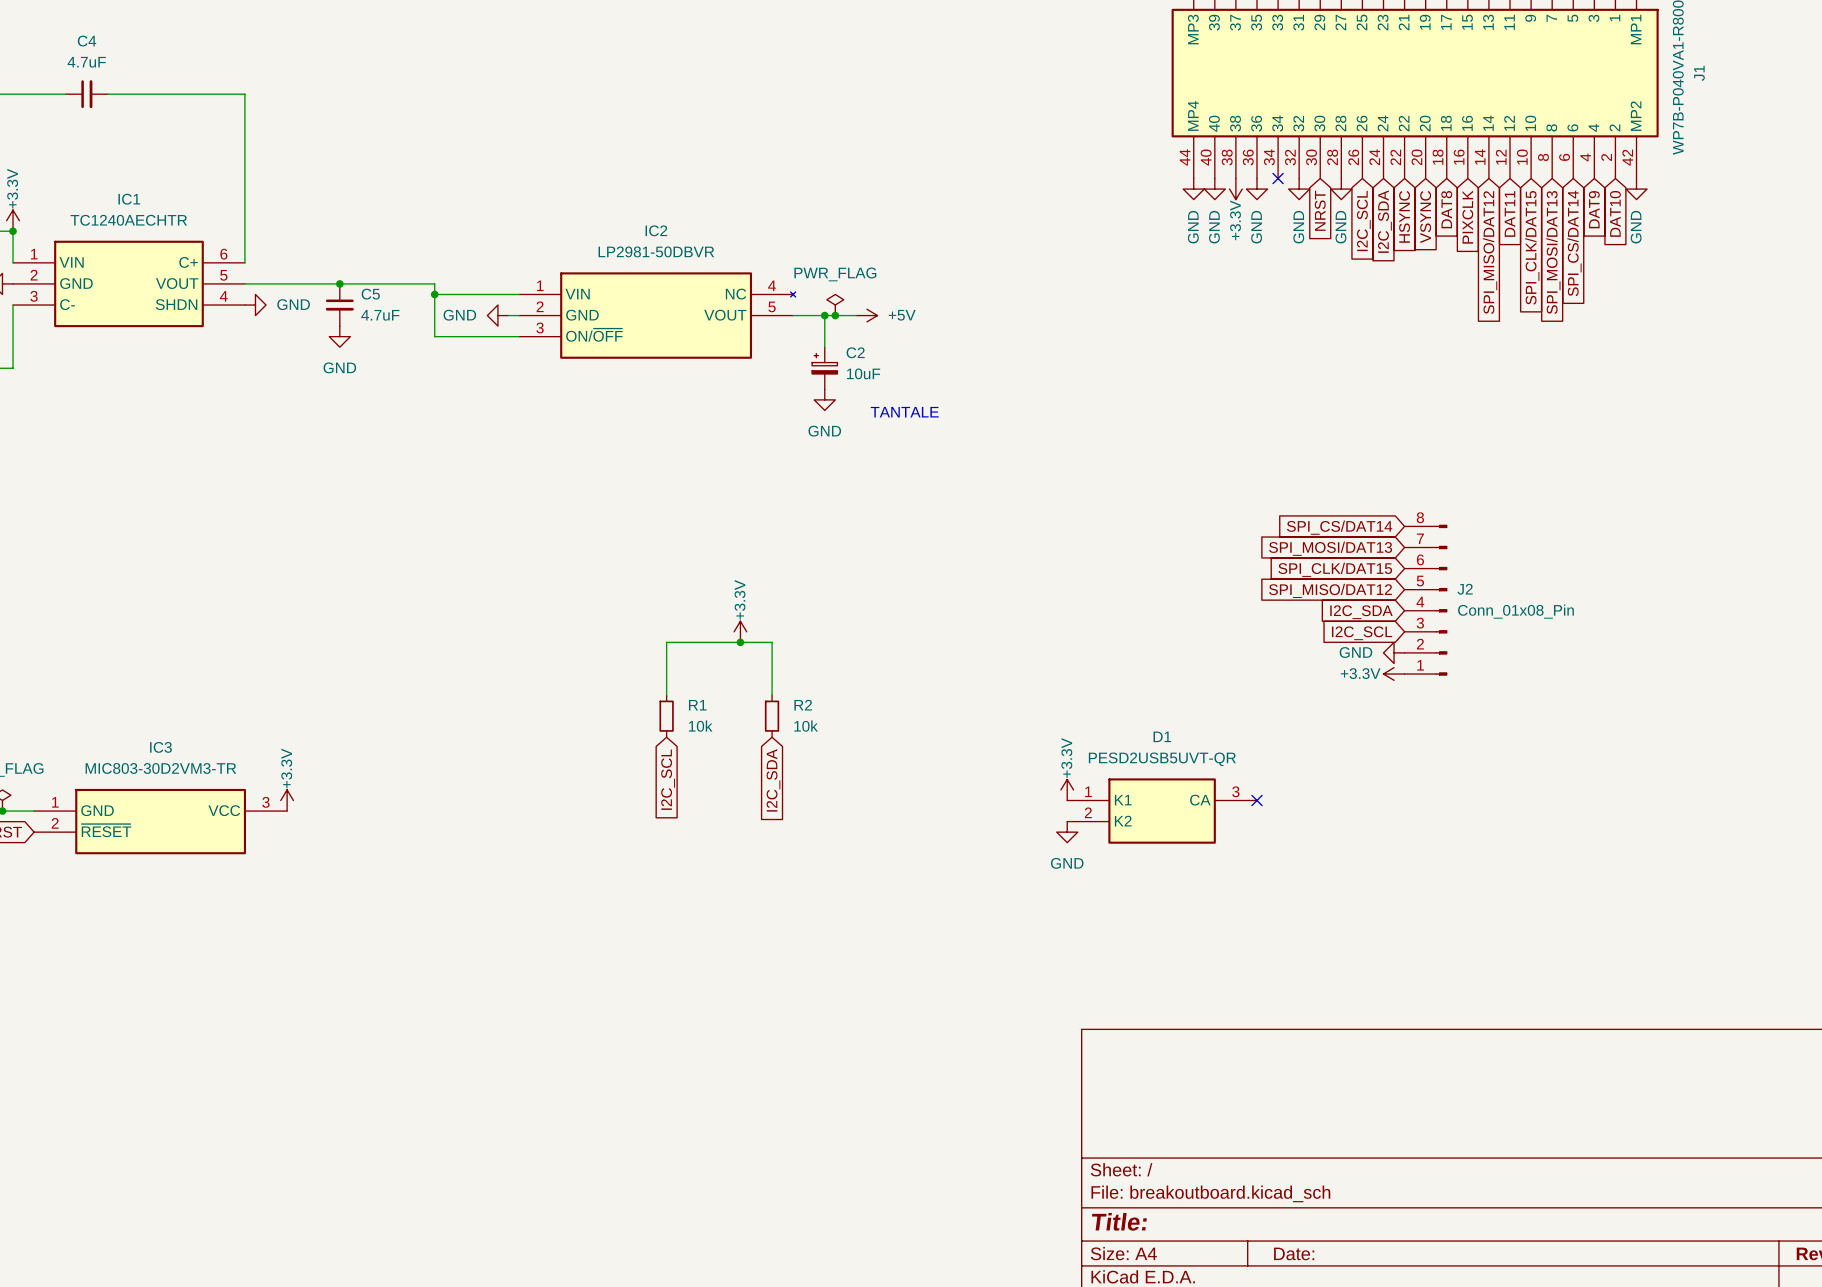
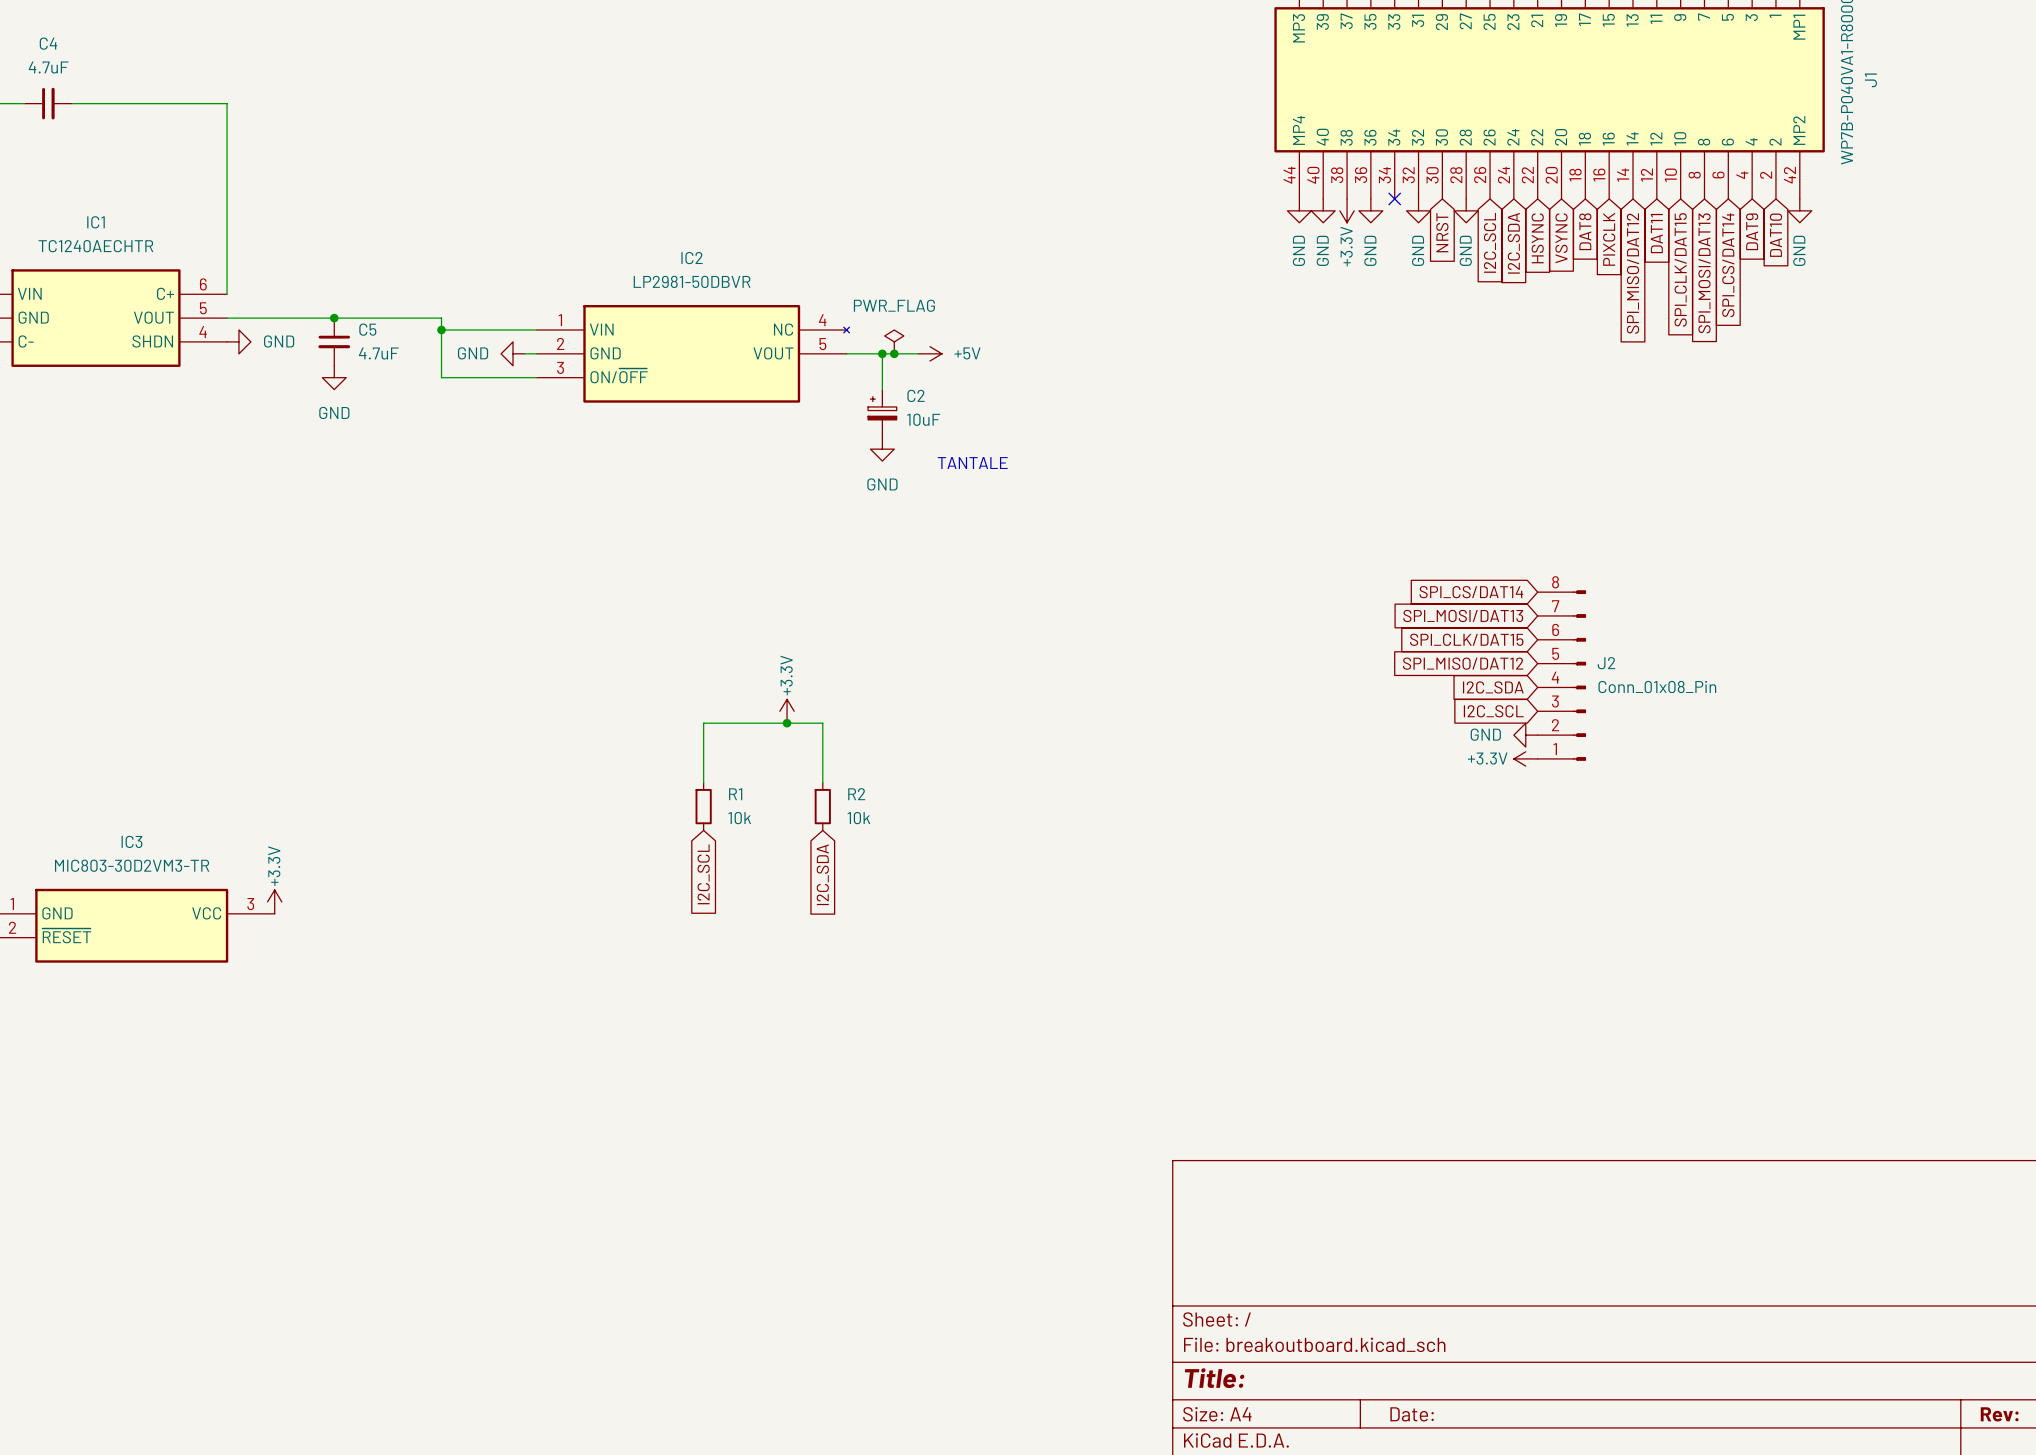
power symbol: +3.3V (1067, 789) -> none
no-connect mark: (1256, 800) -> none
D1: PESD2USB5UVT-QR (1162, 811) -> none
power symbol: GND (1067, 832) -> none

